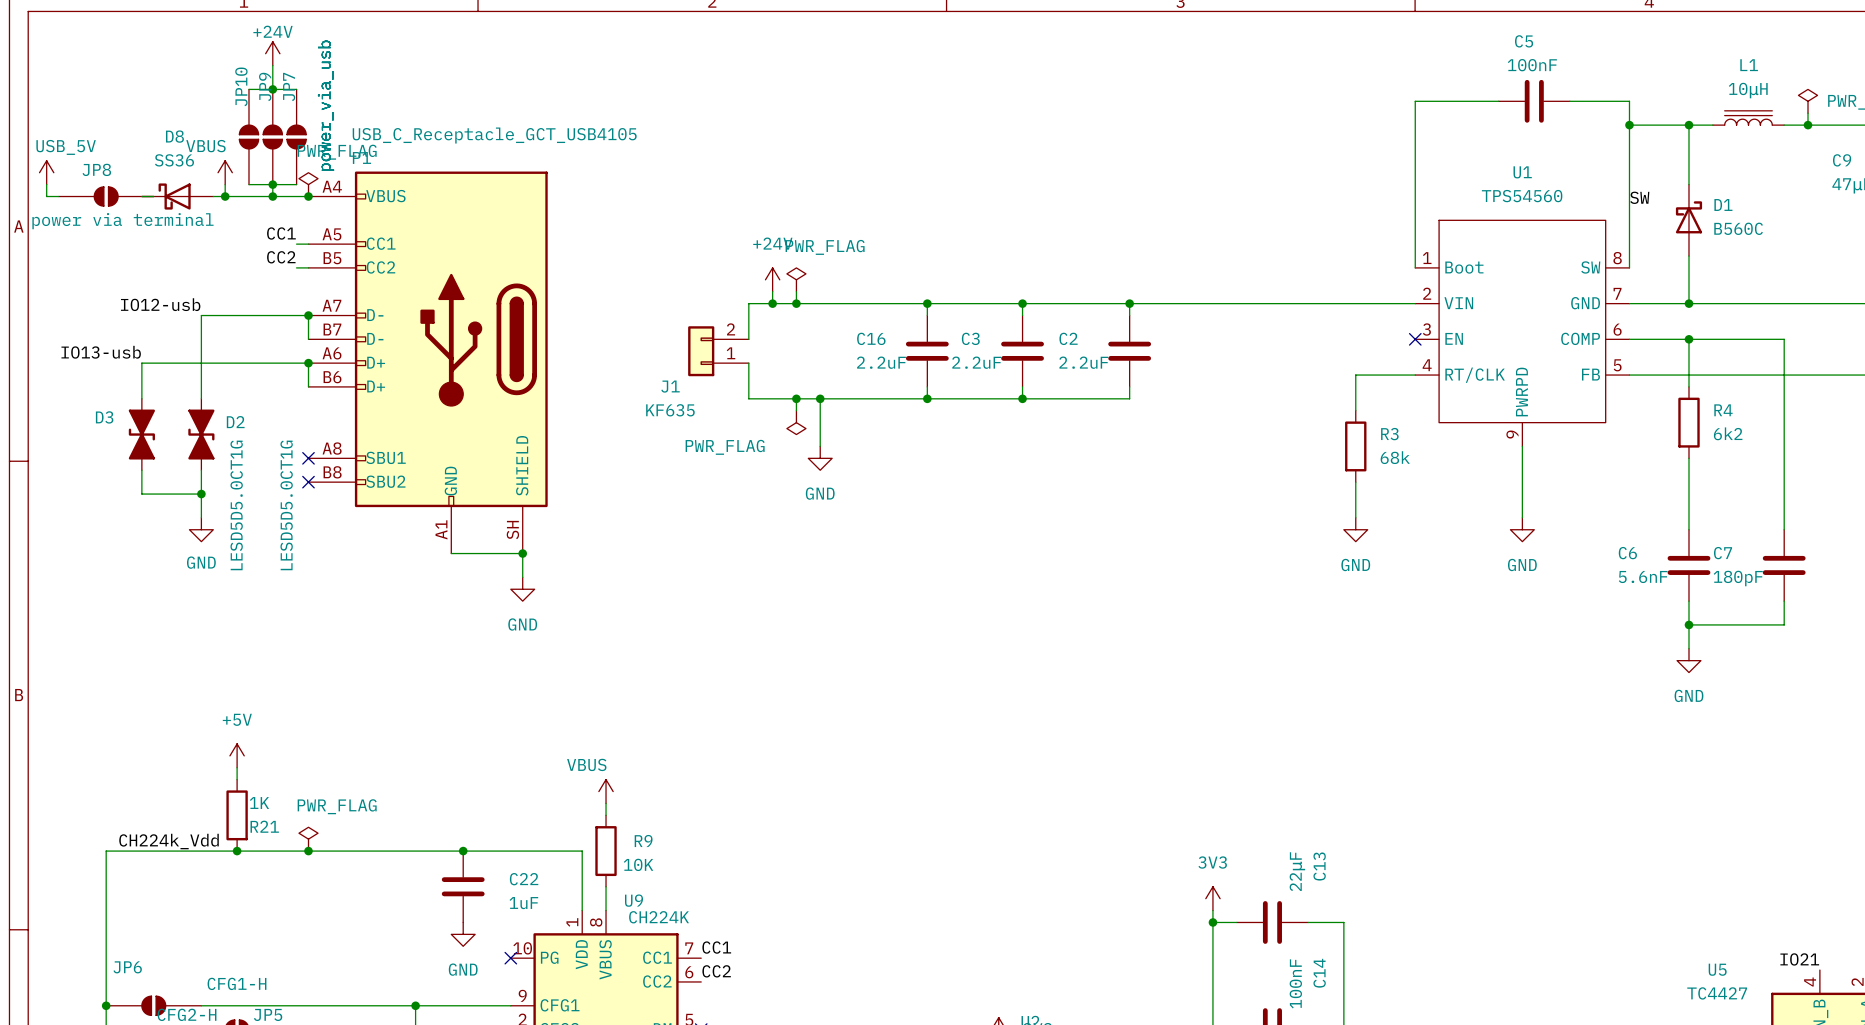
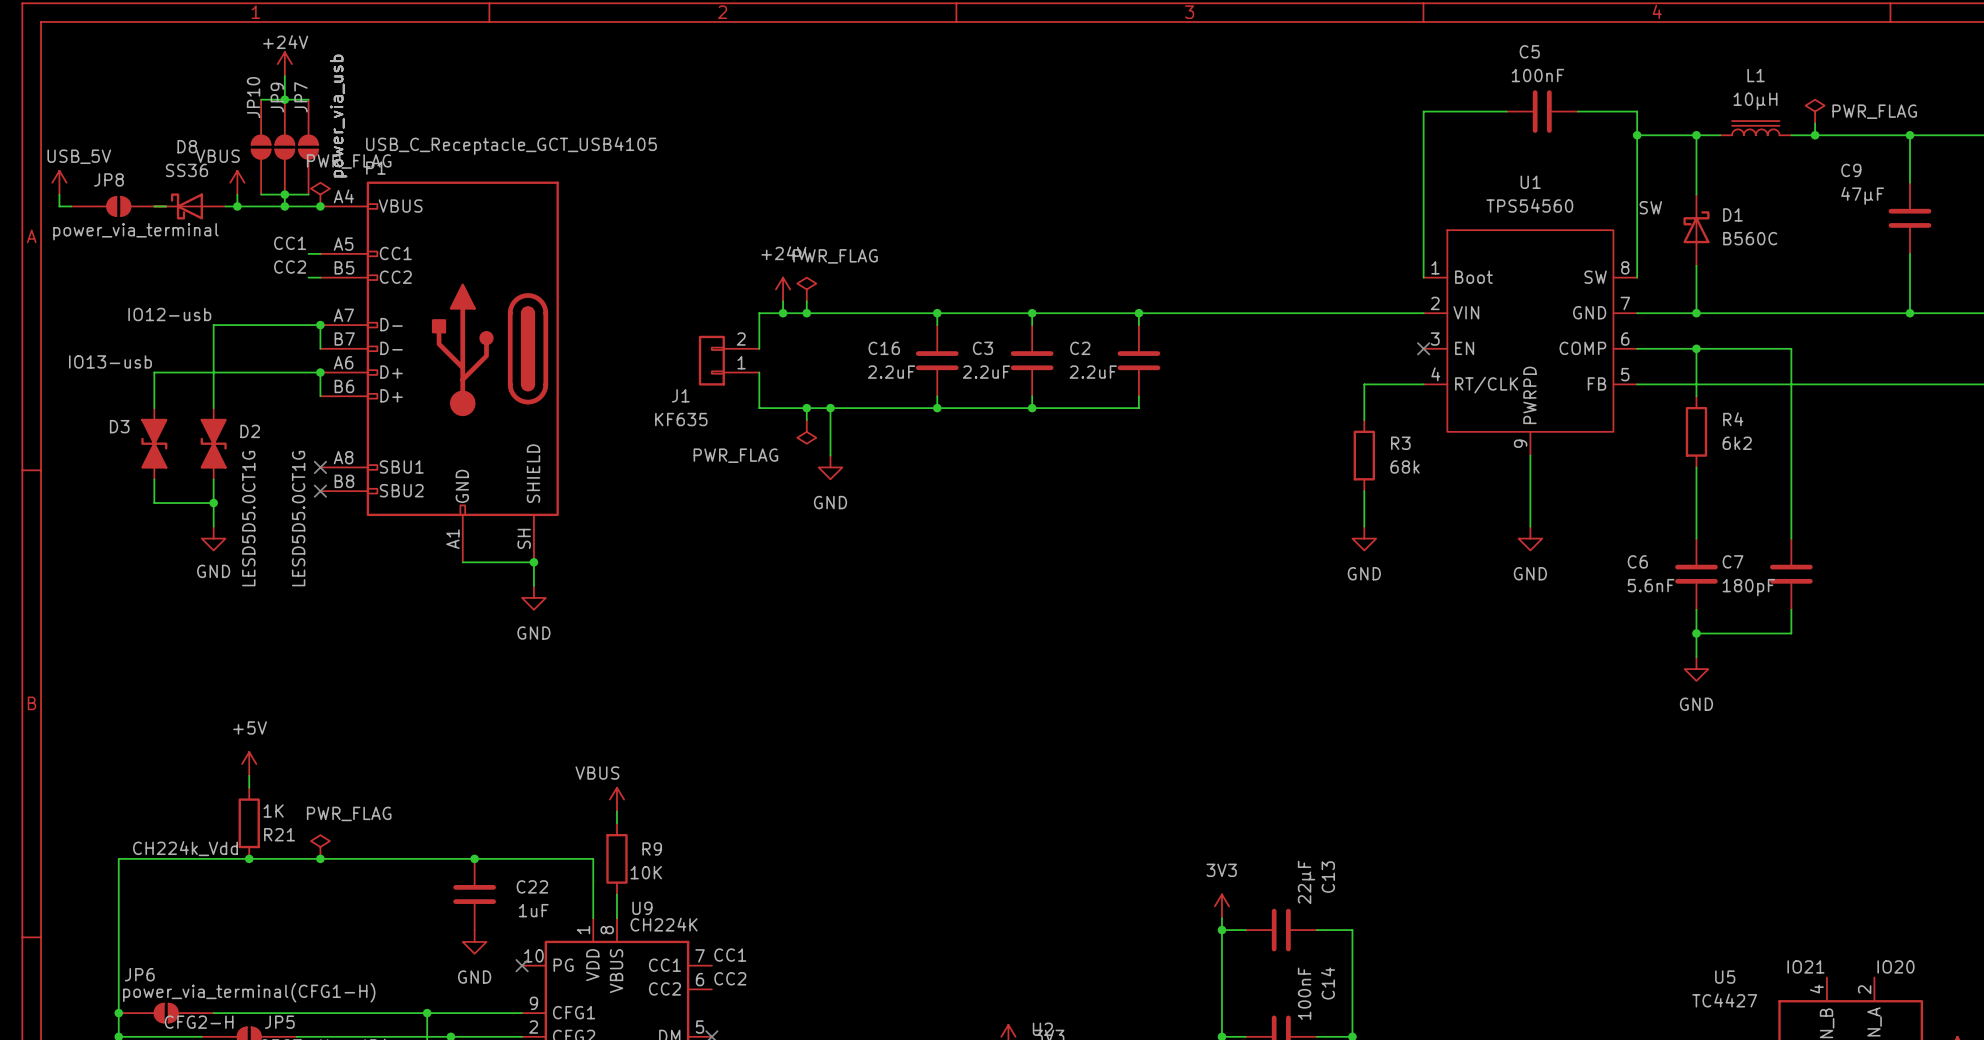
JP8 value: power via terminal (122, 221) -> power_via_terminal (135, 231)
JP6 value: CFG1-H (237, 983) -> power_via_terminal(CFG1-H) (249, 992)

